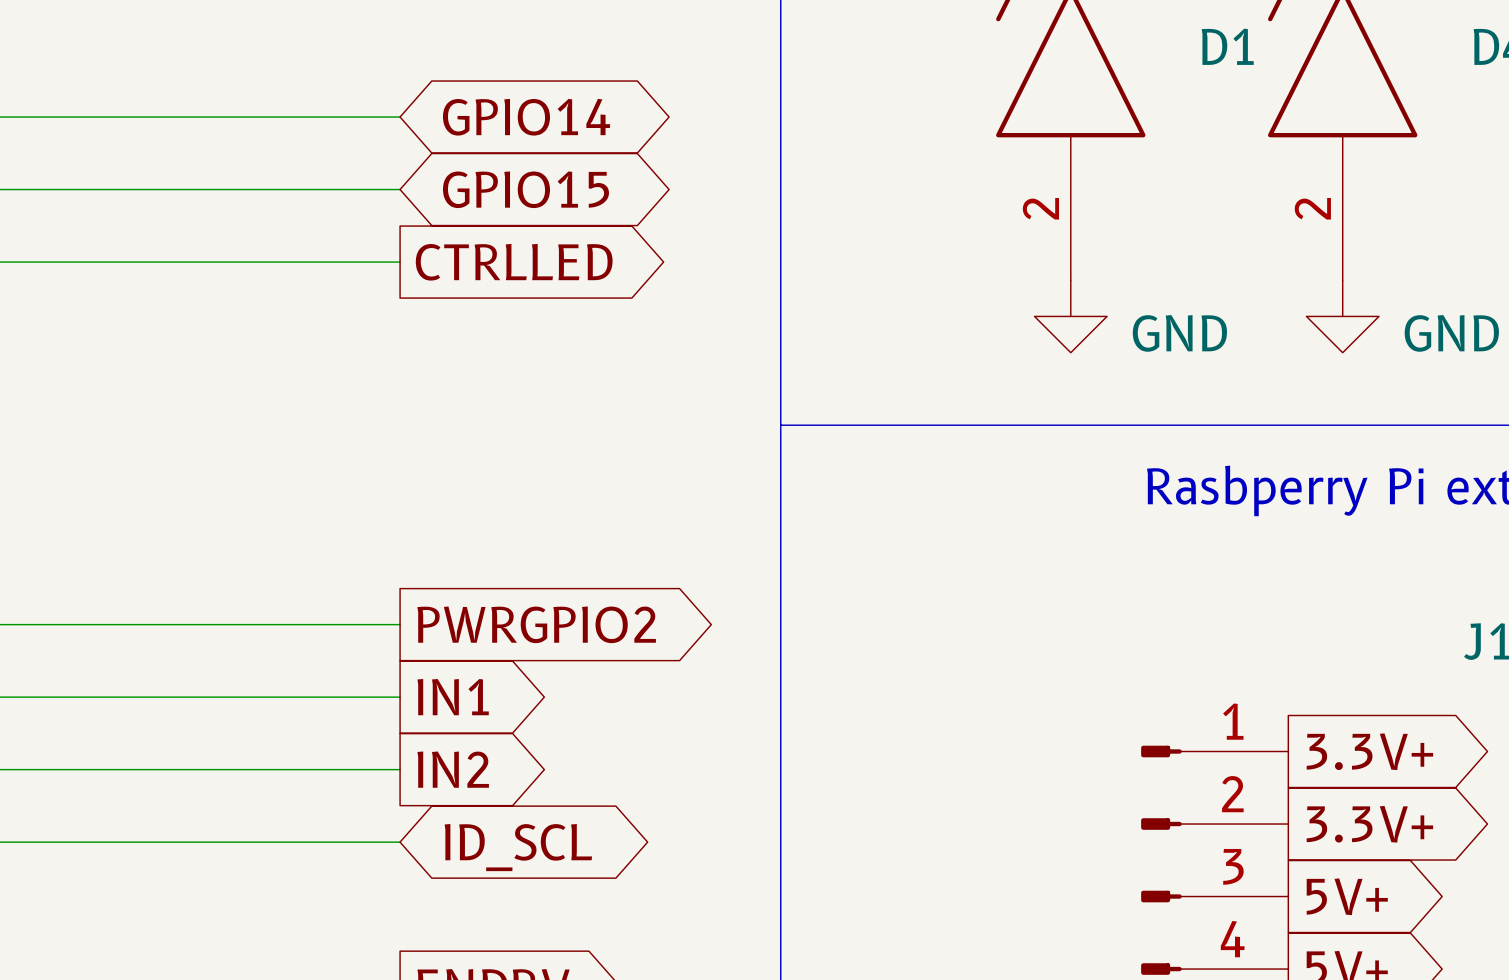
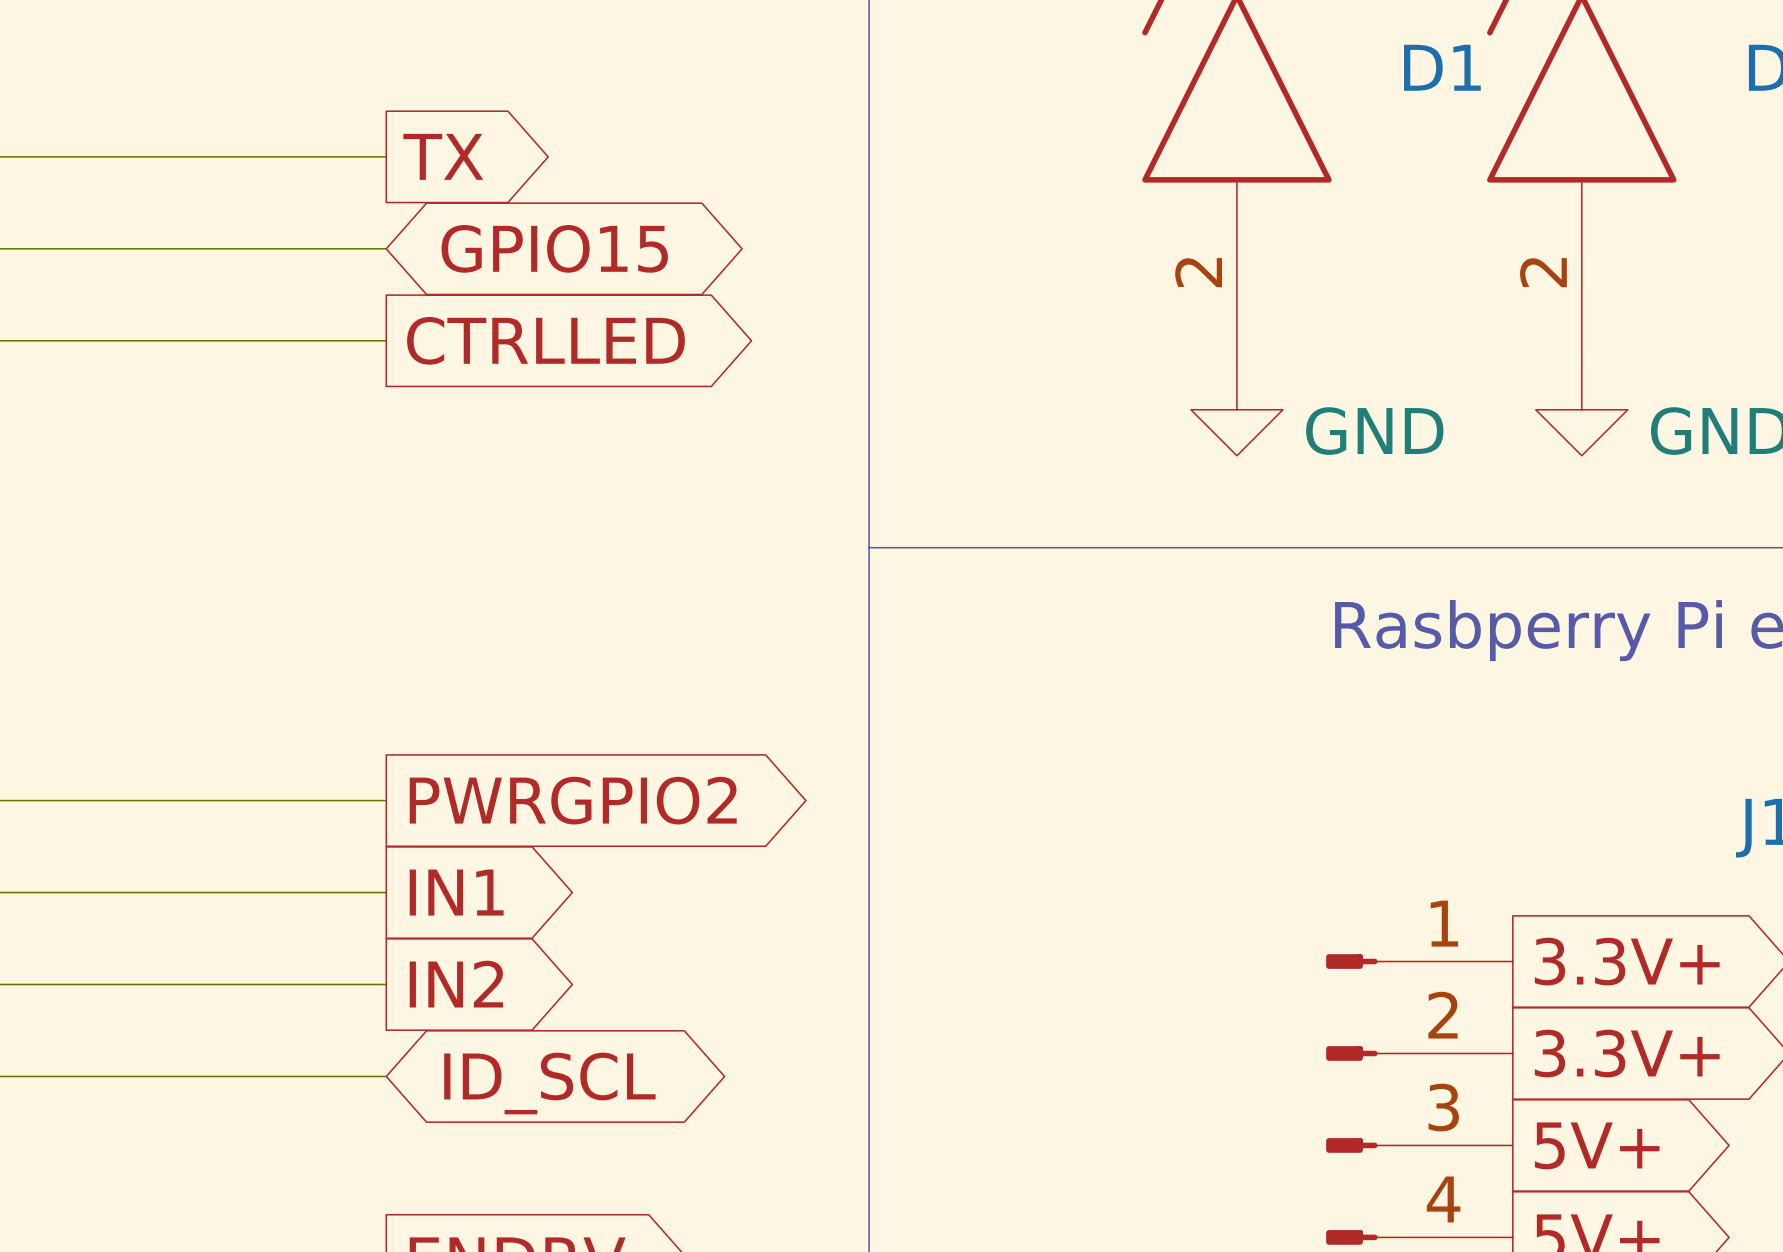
global label shape: bidirectional (526, 117) -> output (443, 156)
global label: GPIO14 (526, 117) -> TX (443, 156)

